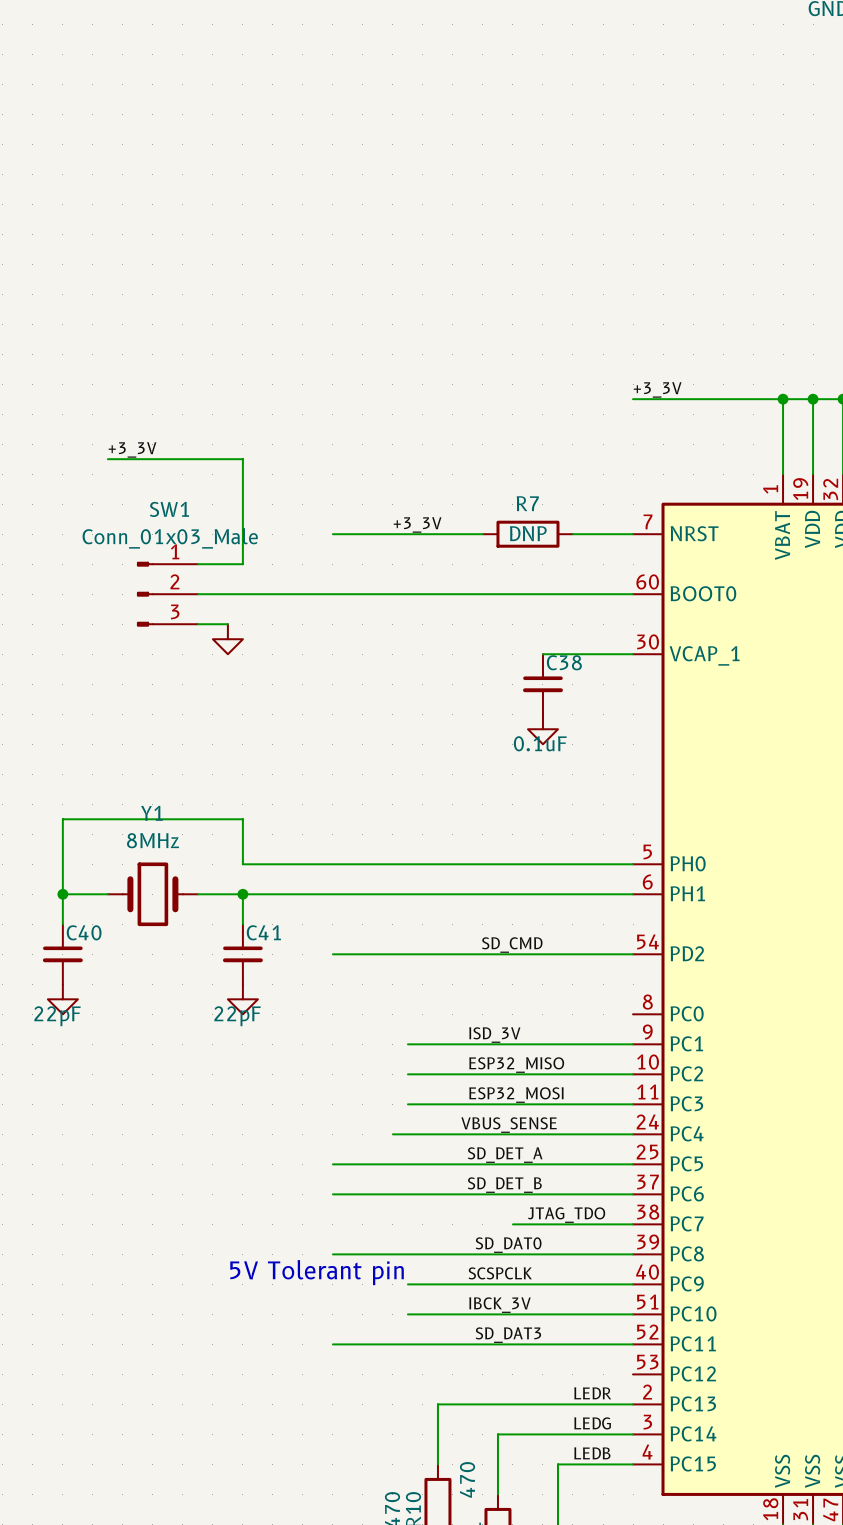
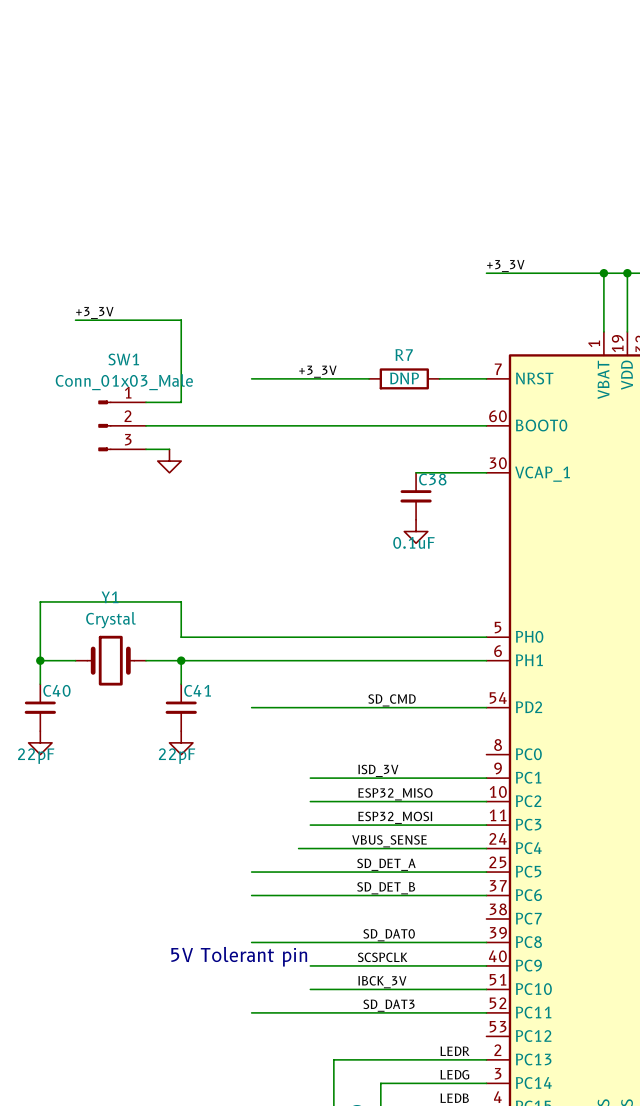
Y1 value: 8MHz (153, 840) -> Crystal (111, 620)
label: JTAG_TDO (566, 1215) -> none
wire: (512, 1224) (633, 1224) -> none

